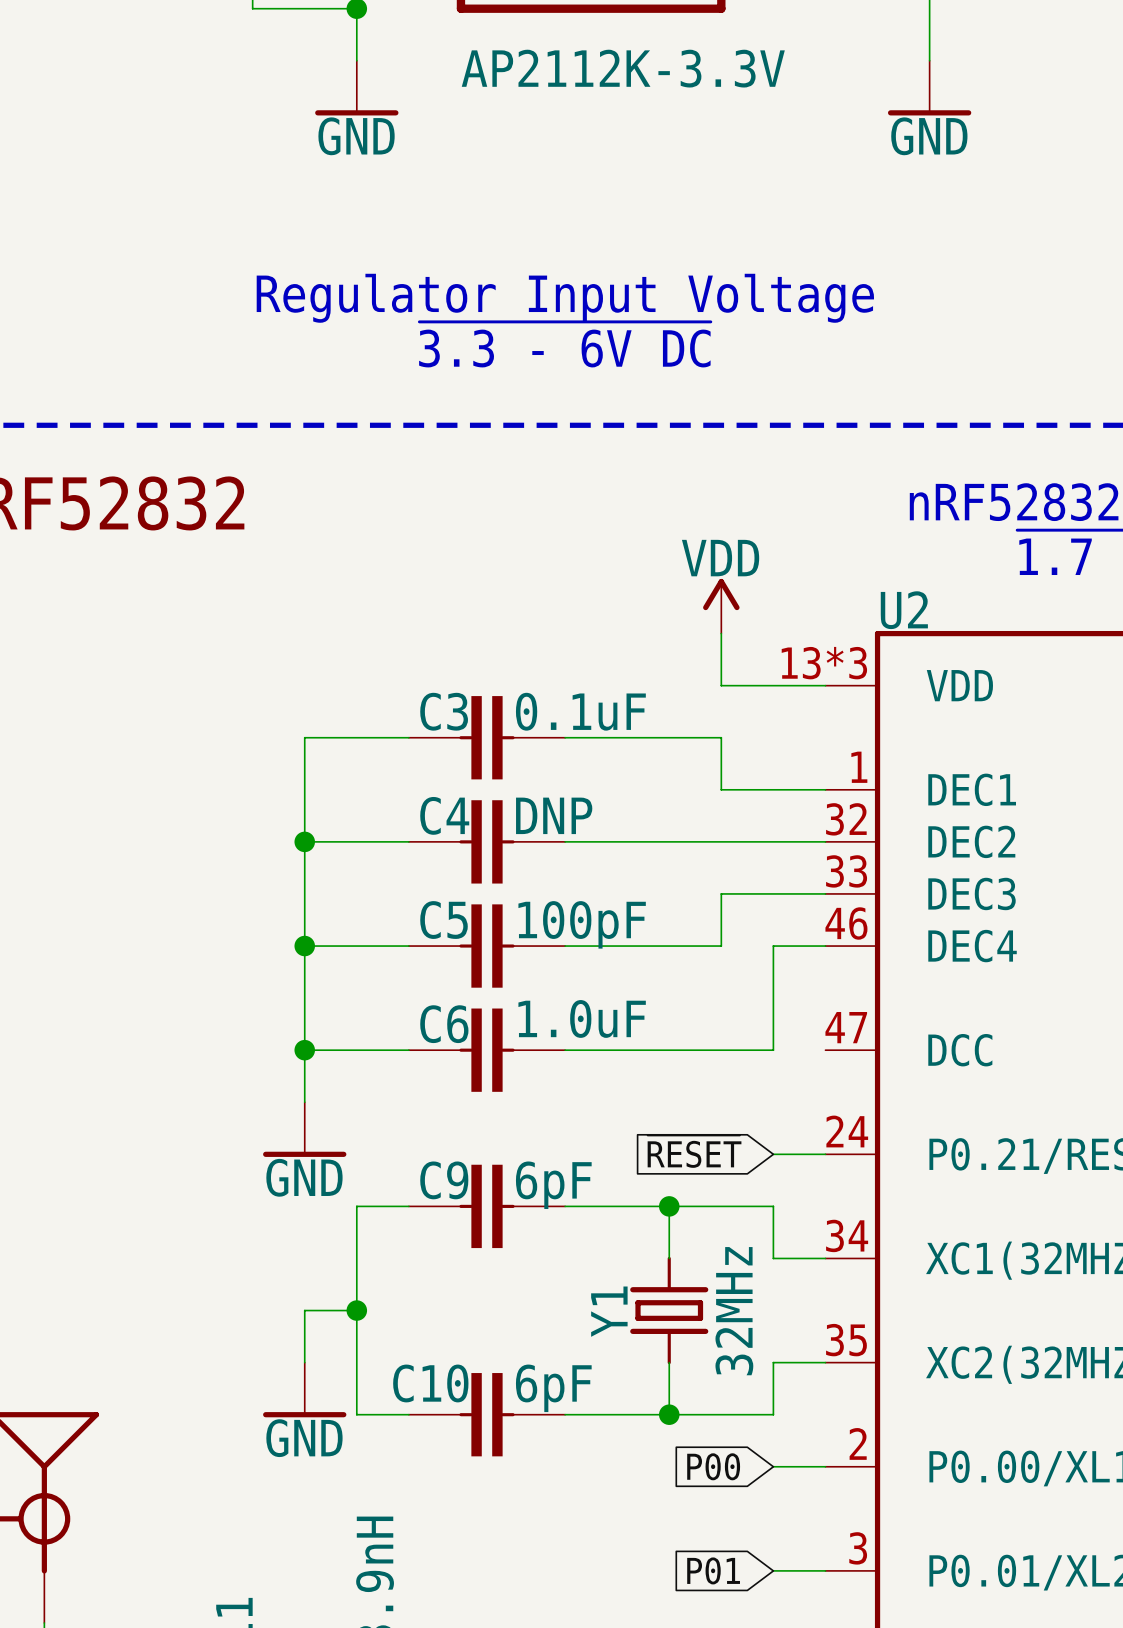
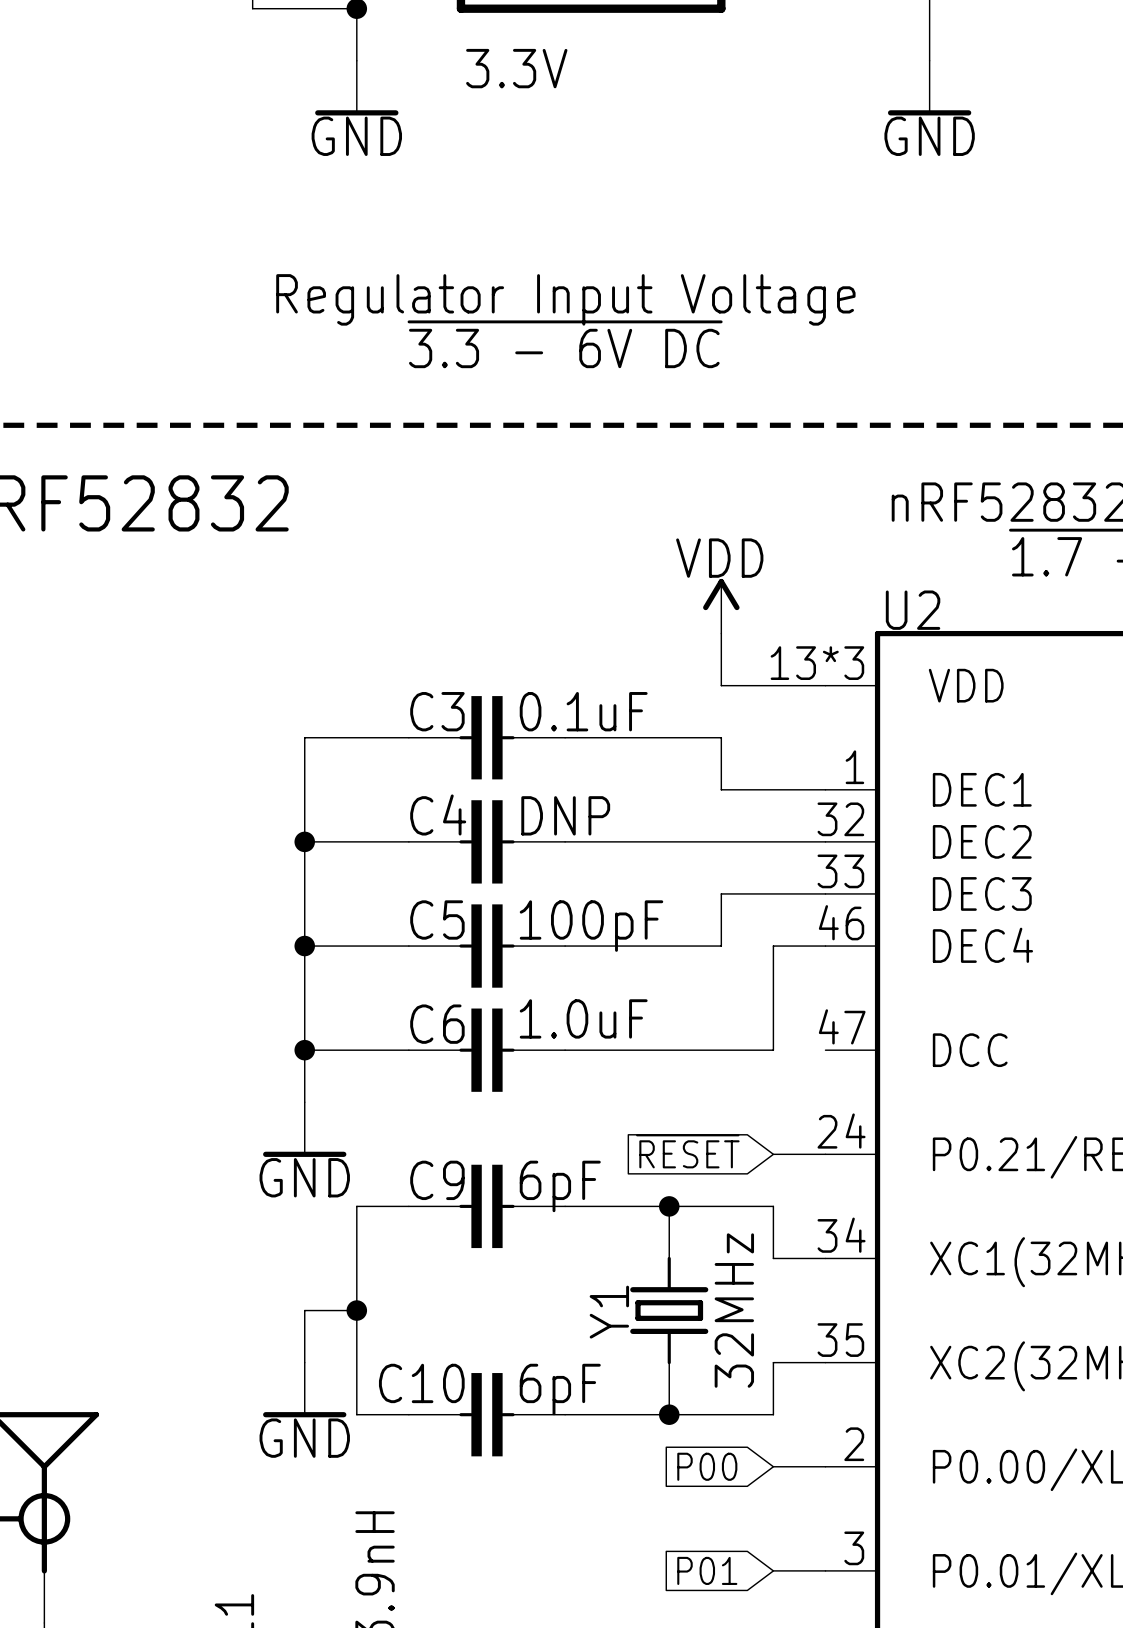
part value: AP2112K-3.3V (623, 68) -> 3.3V (516, 68)

